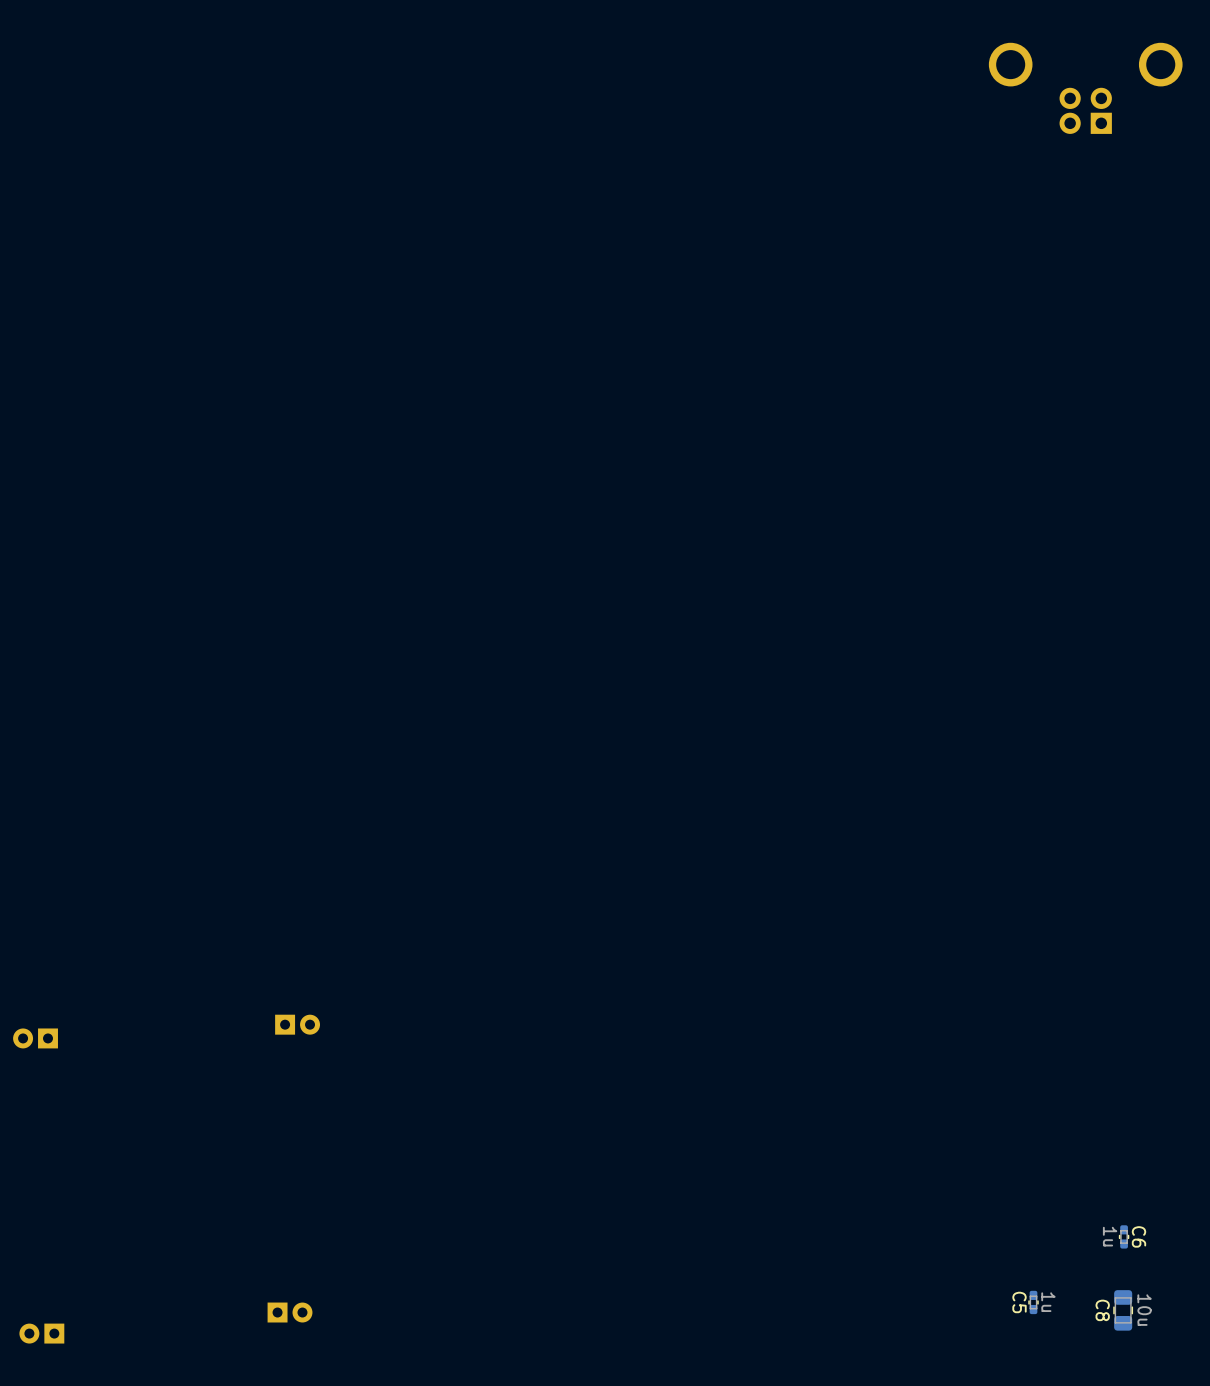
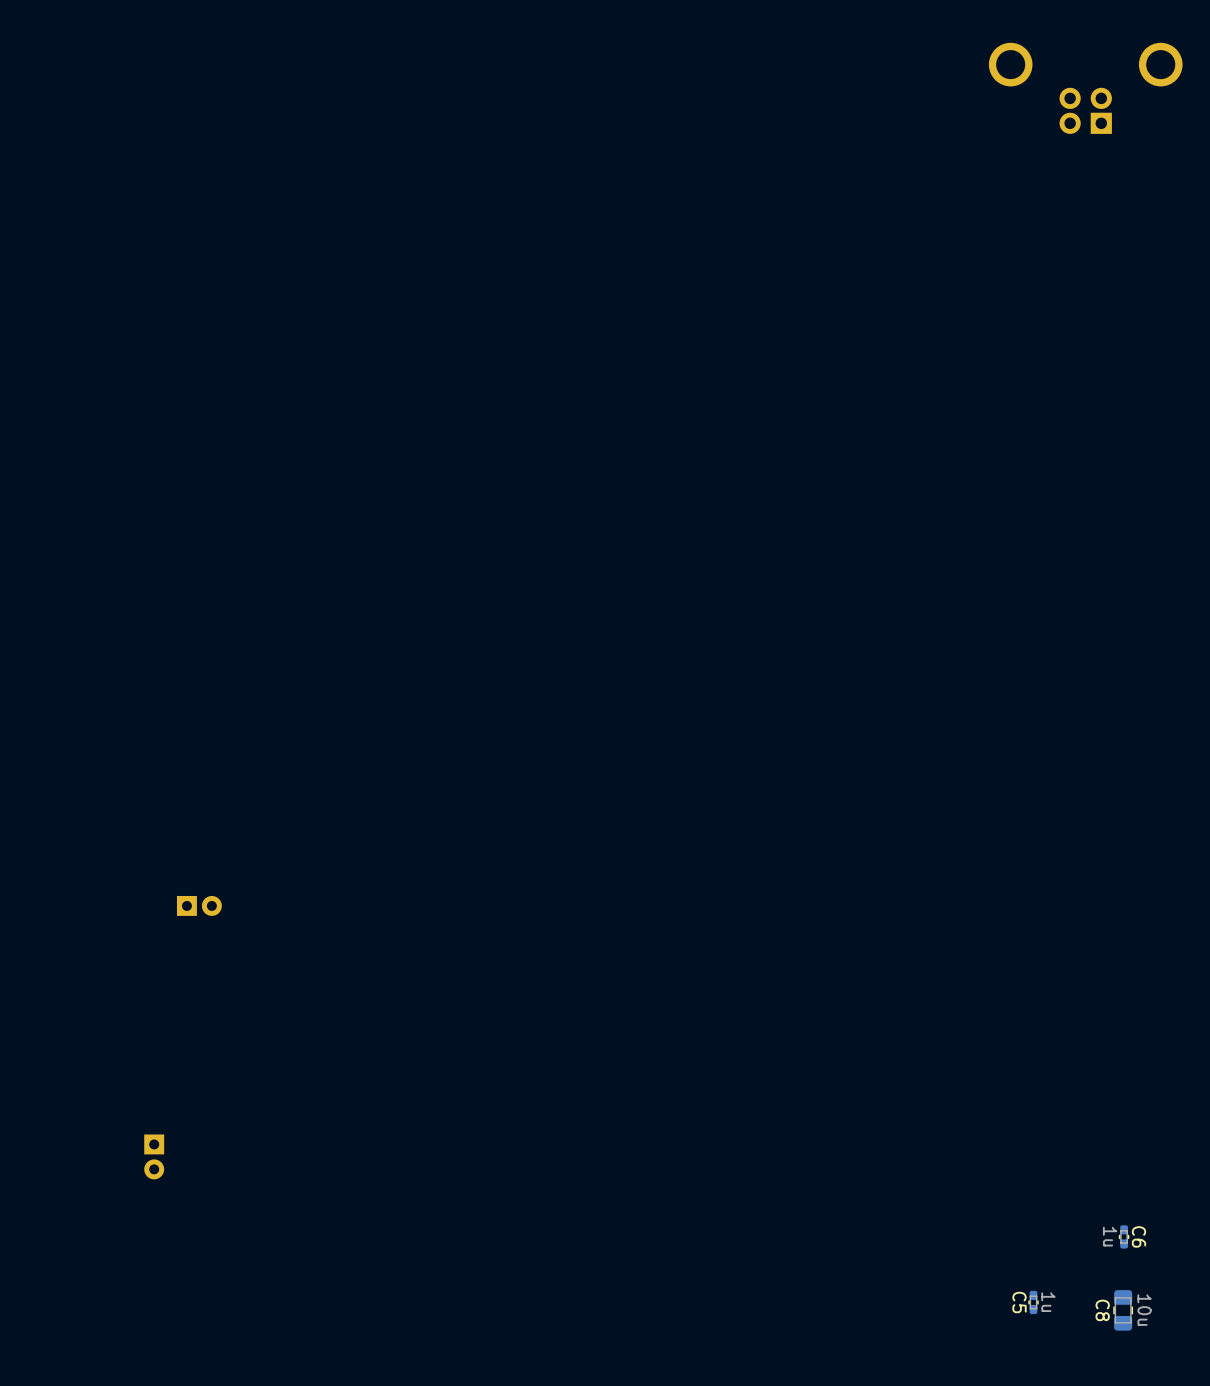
part: none -> (199, 905)
part: (297, 1024) -> none
part: (35, 1038) -> none
part: none -> (154, 1156)
part: (290, 1312) -> none
part: (41, 1333) -> none

